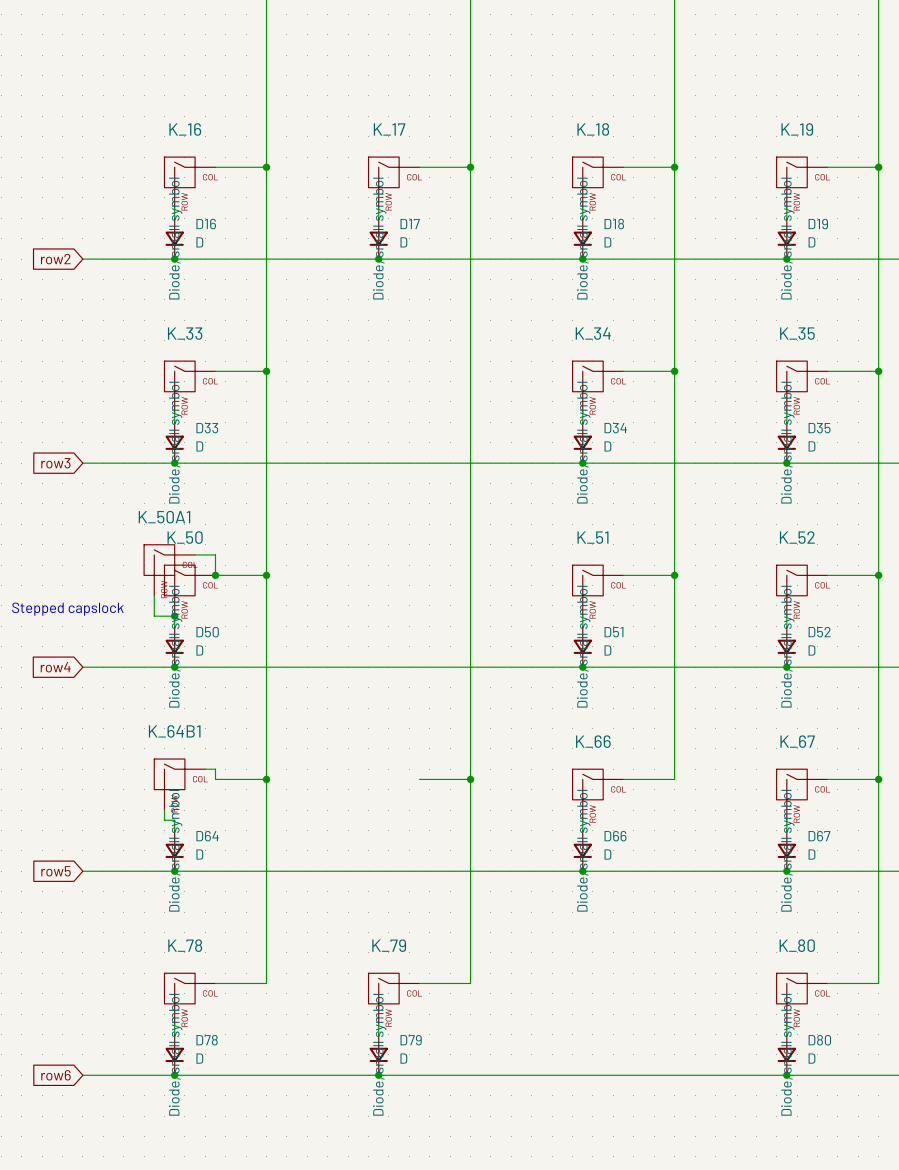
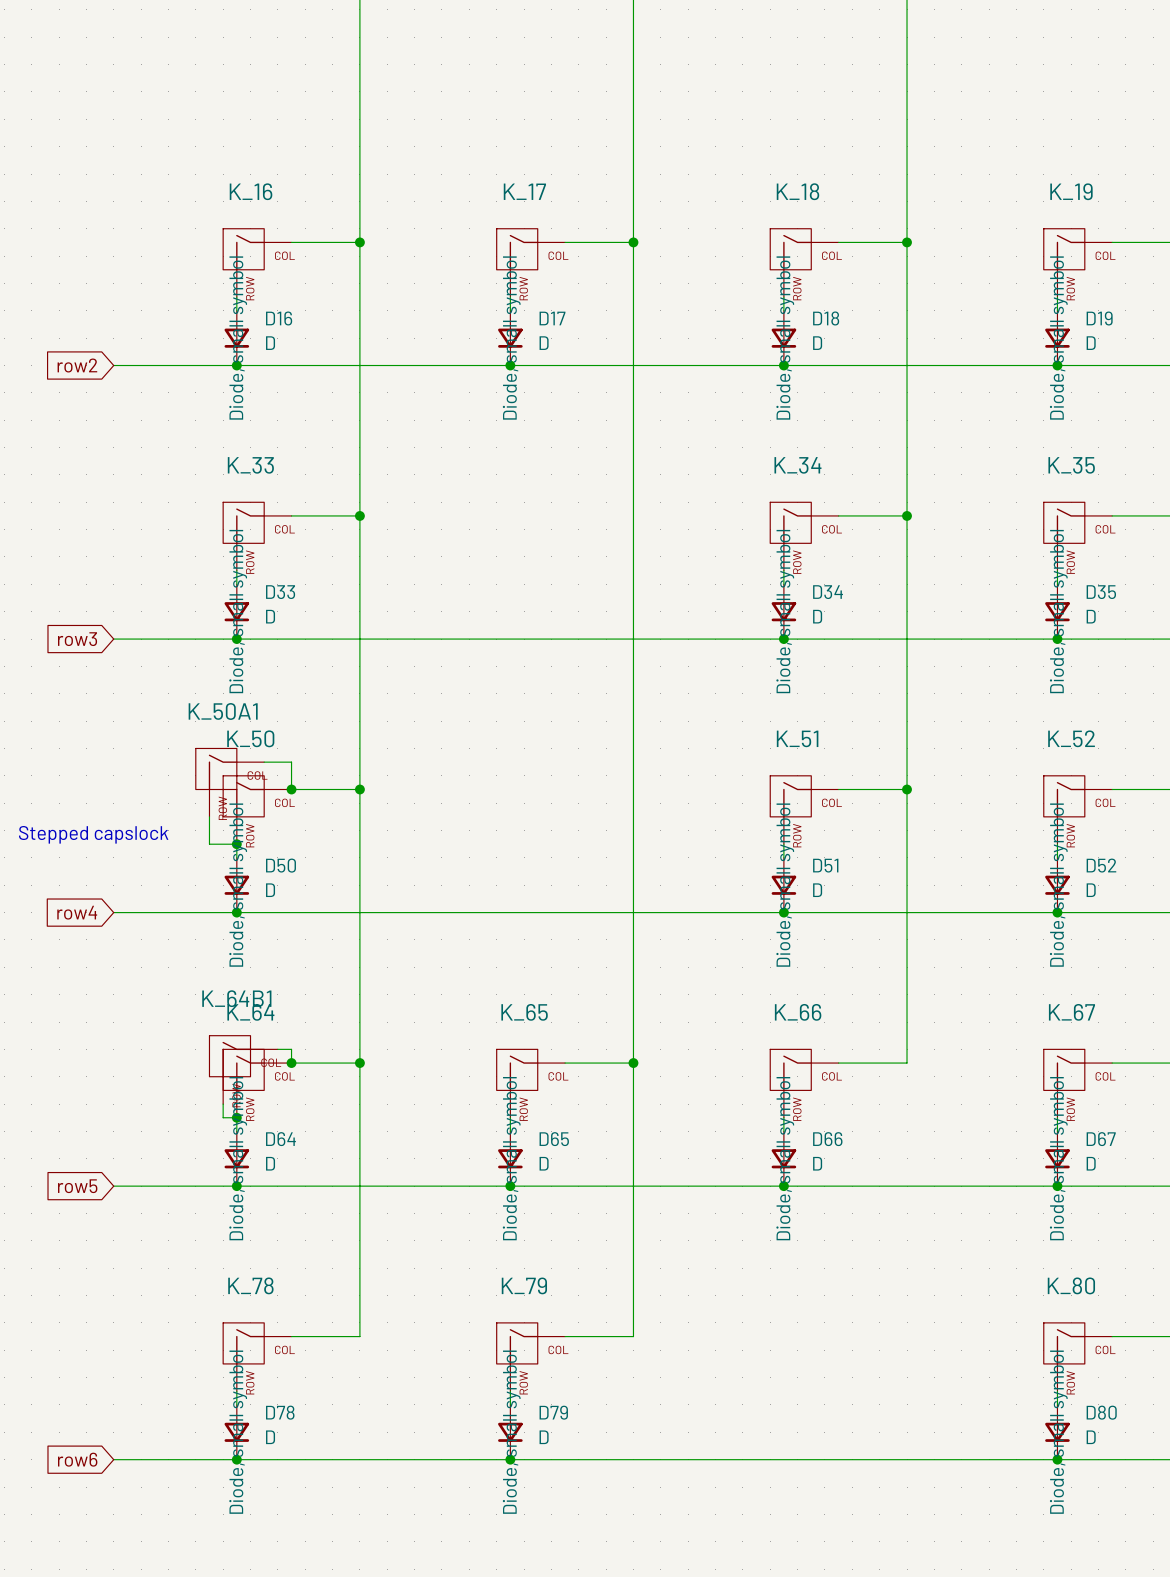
junction: none -> (291, 1063)
K_64: none -> (257, 1083)
K_65: none -> (530, 1083)
junction: none -> (236, 1117)
wire: none -> (510, 1117) (510, 1131)
D65: none -> D (510, 1158)
junction: none -> (510, 1186)

